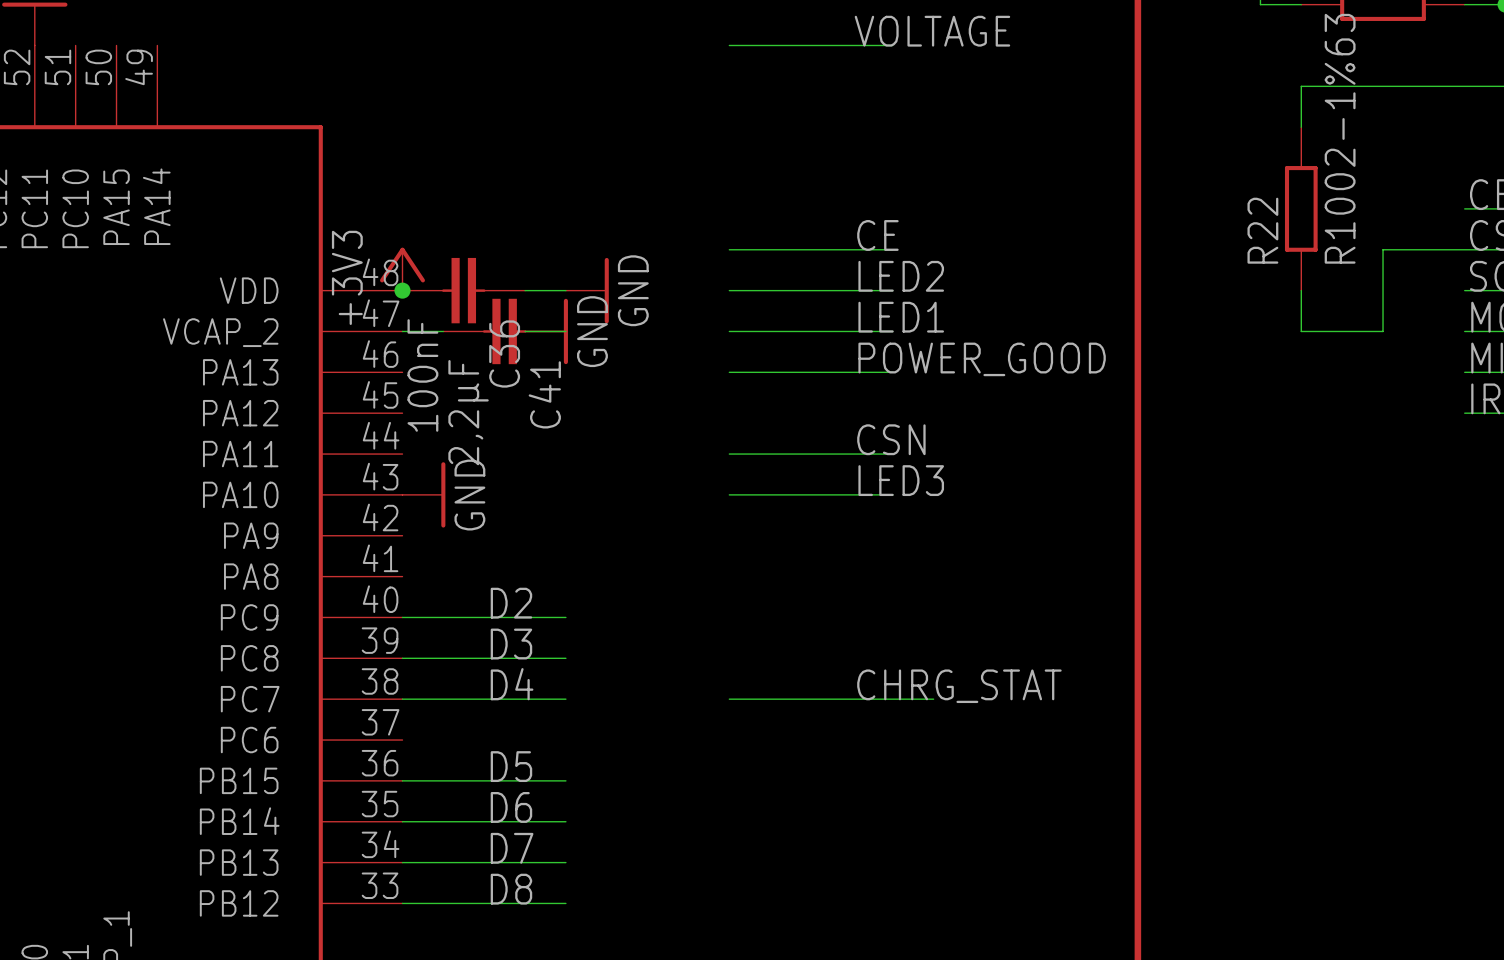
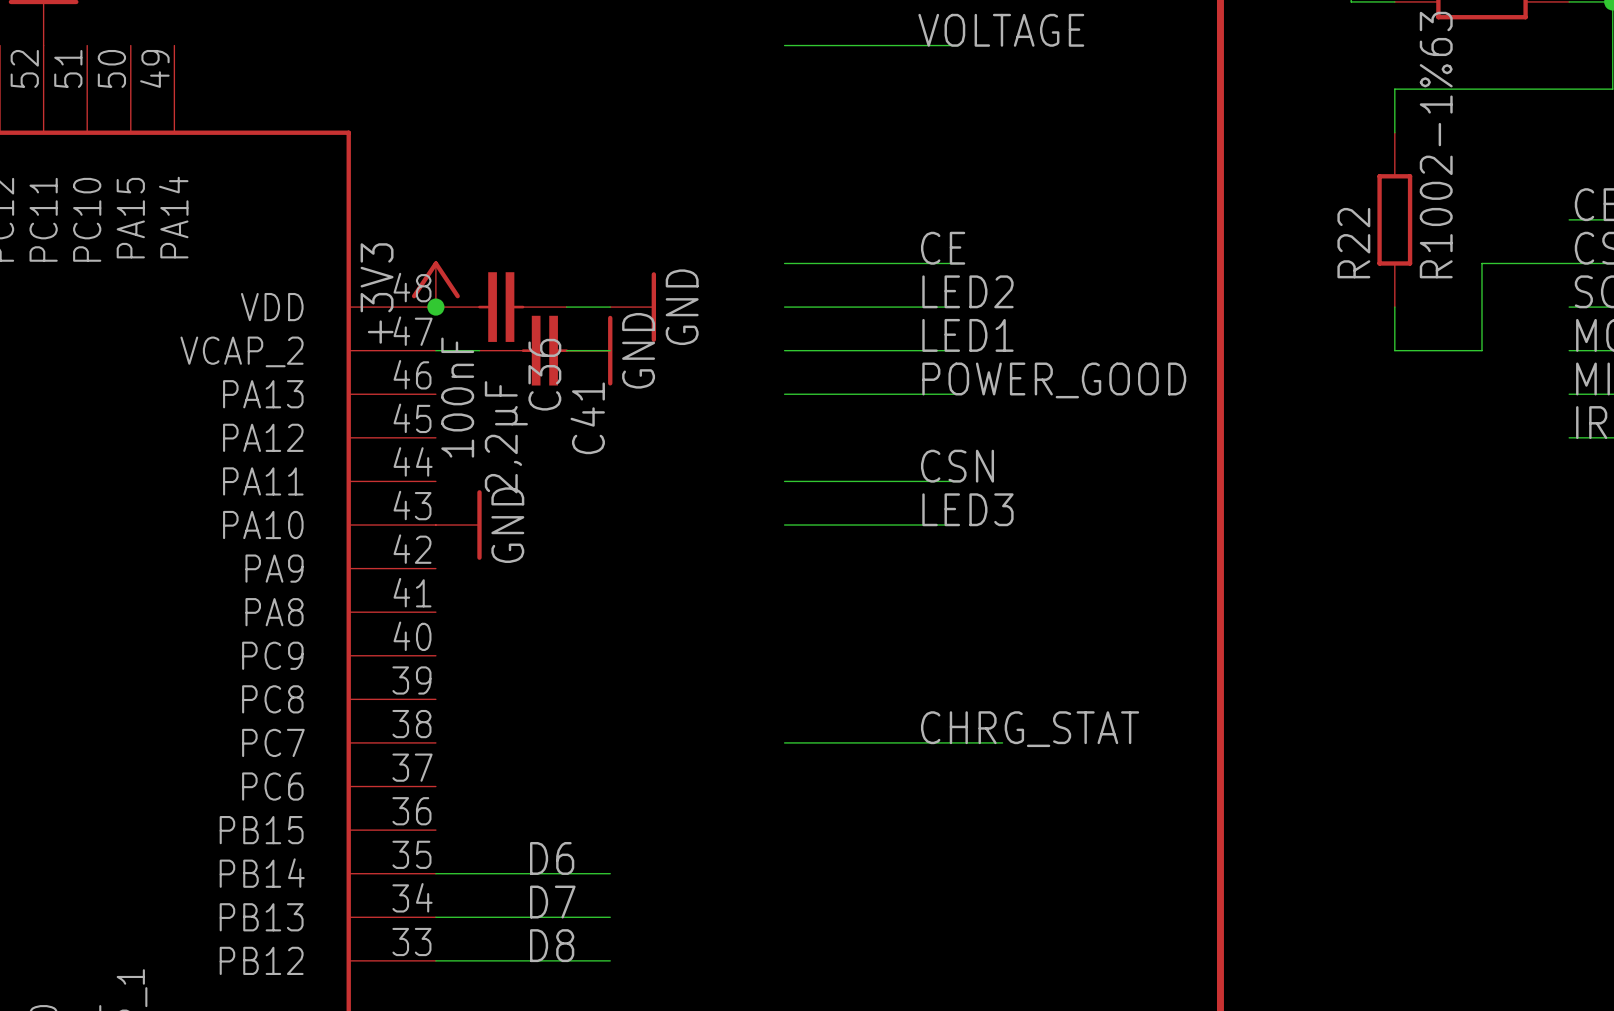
label: D2 (511, 603) -> none
wire: (402, 617) (565, 617) -> none
label: D3 (511, 644) -> none
wire: (402, 658) (565, 658) -> none
label: D4 (512, 684) -> none
wire: (402, 699) (565, 699) -> none
label: D5 (511, 766) -> none
wire: (402, 780) (565, 780) -> none

